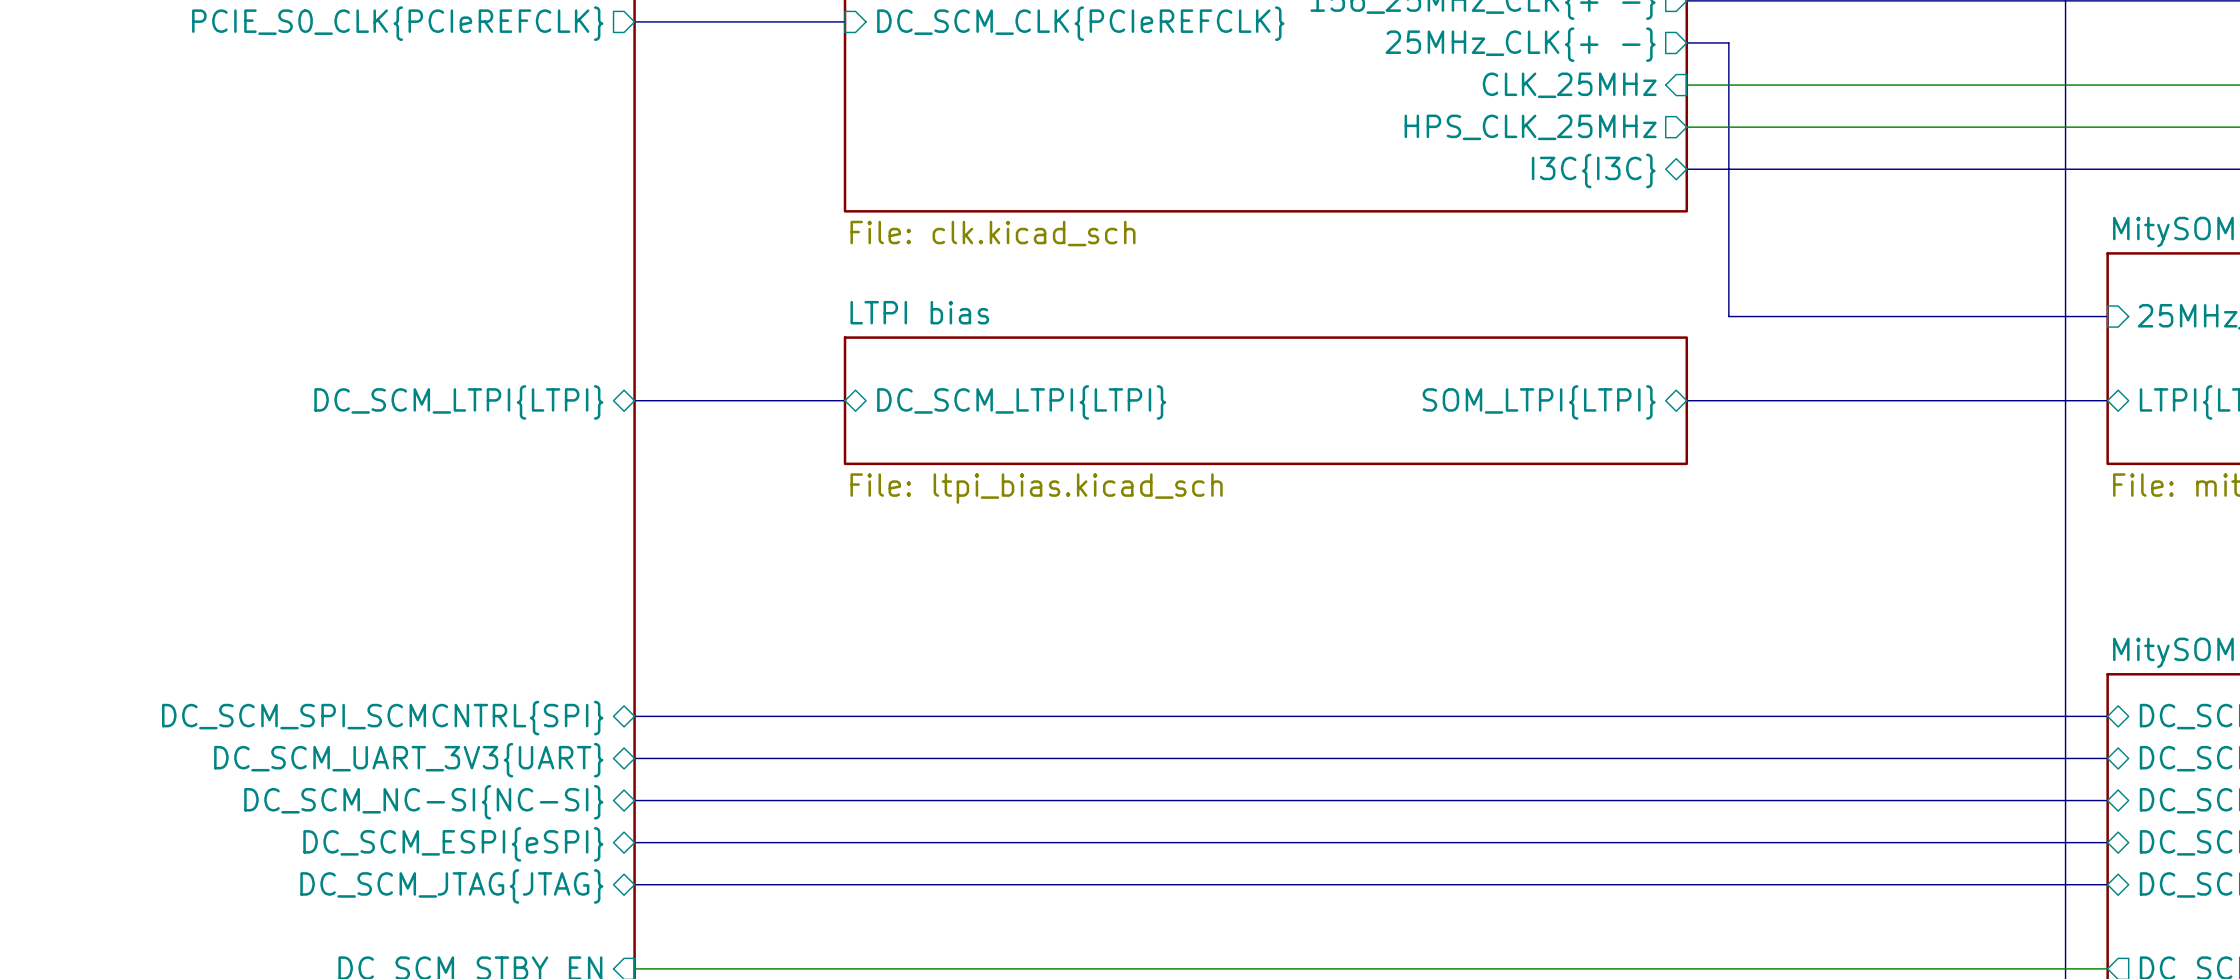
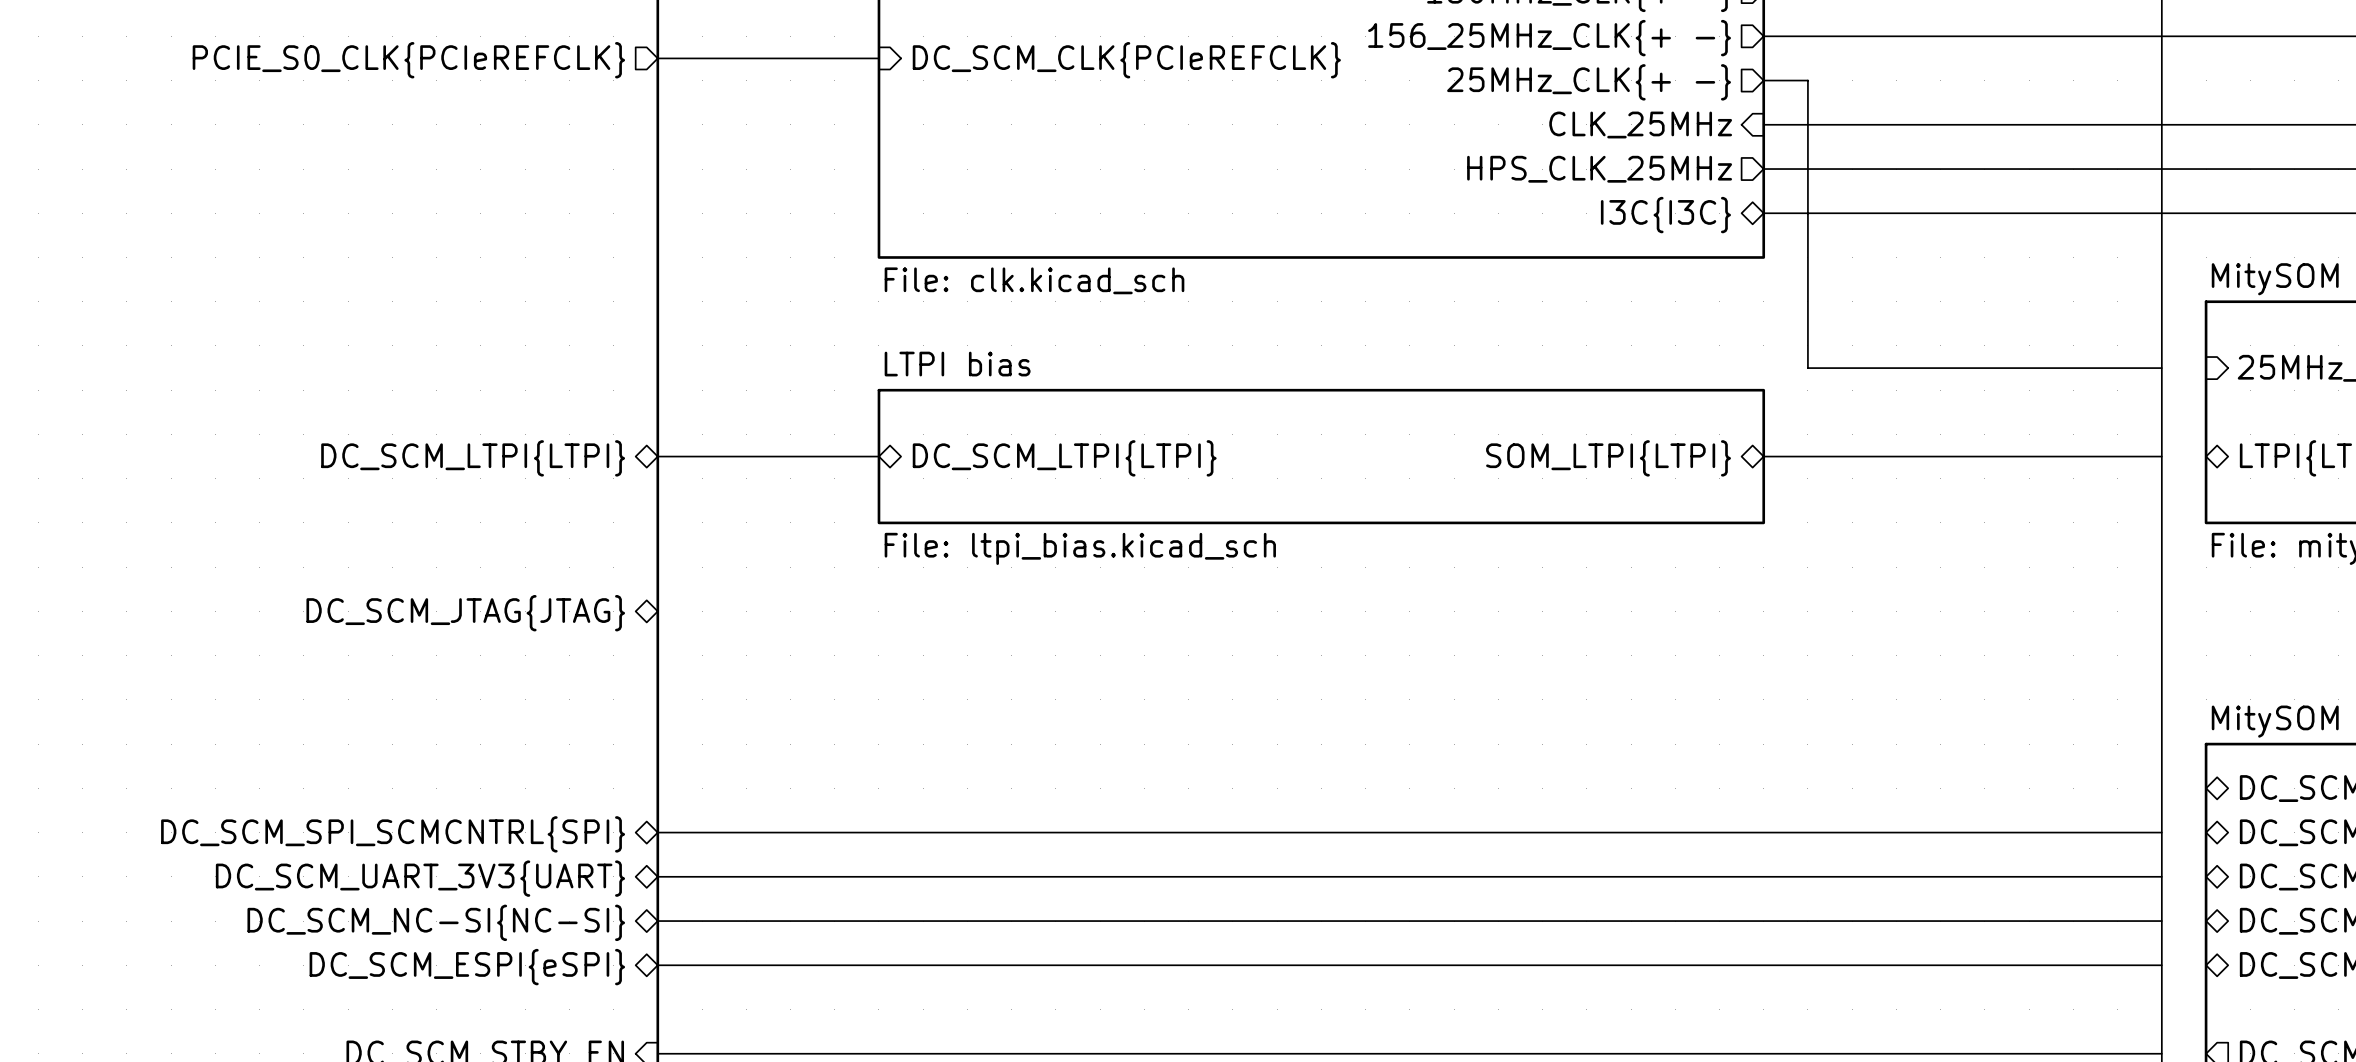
bus: (2065, 316) (2107, 316) -> none
bus: (2065, 400) (2107, 400) -> none
sheet pin: none -> DC_SCM_JTAG{JTAG} (465, 613)
bus: (634, 716) (2107, 716) -> none
sheet pin: DC_SCM_SPI_SCMCNTRL{SPI} (382, 718) -> none
bus: (2065, 758) (2107, 758) -> none
sheet pin: DC_SCM_UART_3V3{UART} (408, 760) -> DC_SCM_SPI_SCMCNTRL{SPI} (393, 834)
bus: (2065, 800) (2107, 800) -> none
sheet pin: DC_SCM_NC-SI{NC-SI} (423, 802) -> DC_SCM_UART_3V3{UART} (420, 878)
bus: (2065, 842) (2107, 842) -> none
sheet pin: DC_SCM_ESPI{eSPI} (453, 844) -> DC_SCM_NC-SI{NC-SI} (436, 922)
bus: (2065, 884) (2107, 884) -> none
sheet pin: DC_SCM_JTAG{JTAG} (451, 886) -> DC_SCM_ESPI{eSPI} (467, 967)
wire: (2065, 968) (2107, 968) -> none

